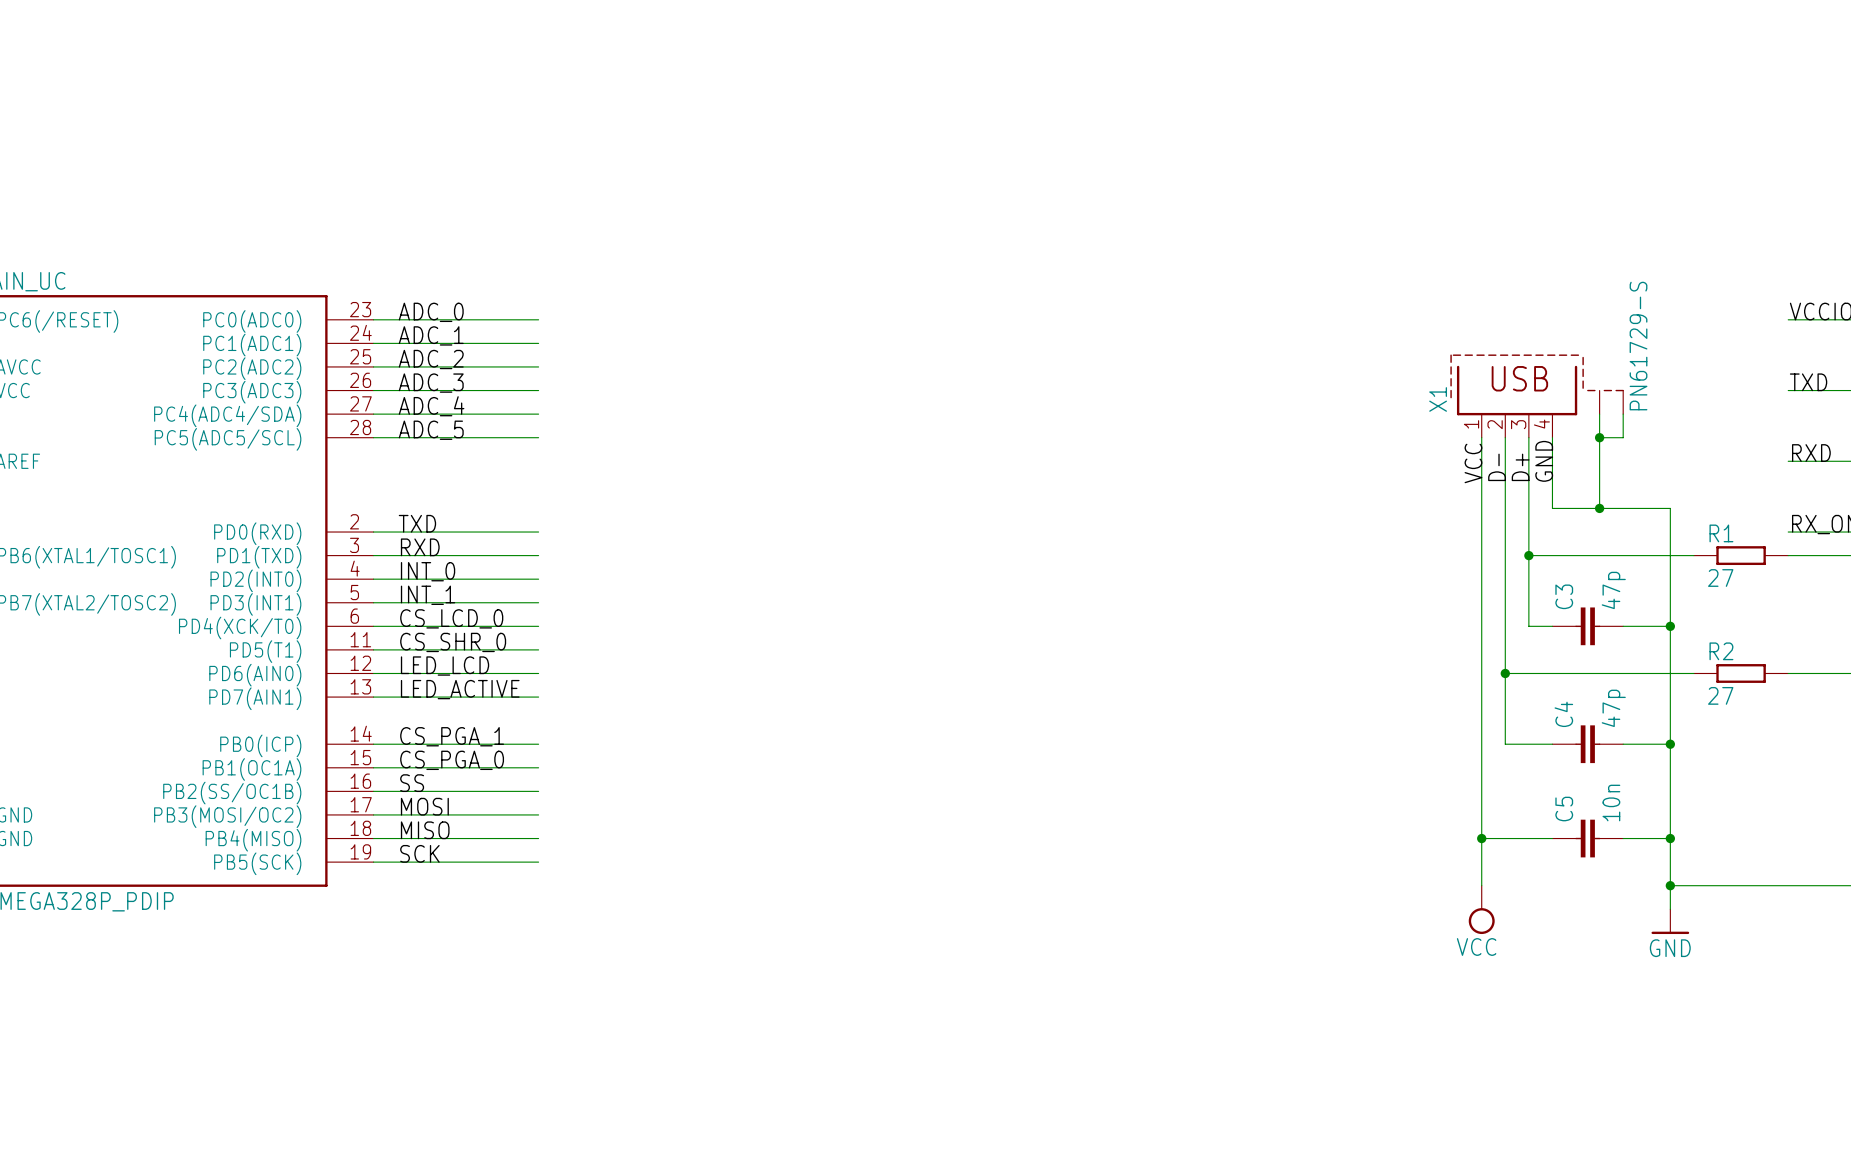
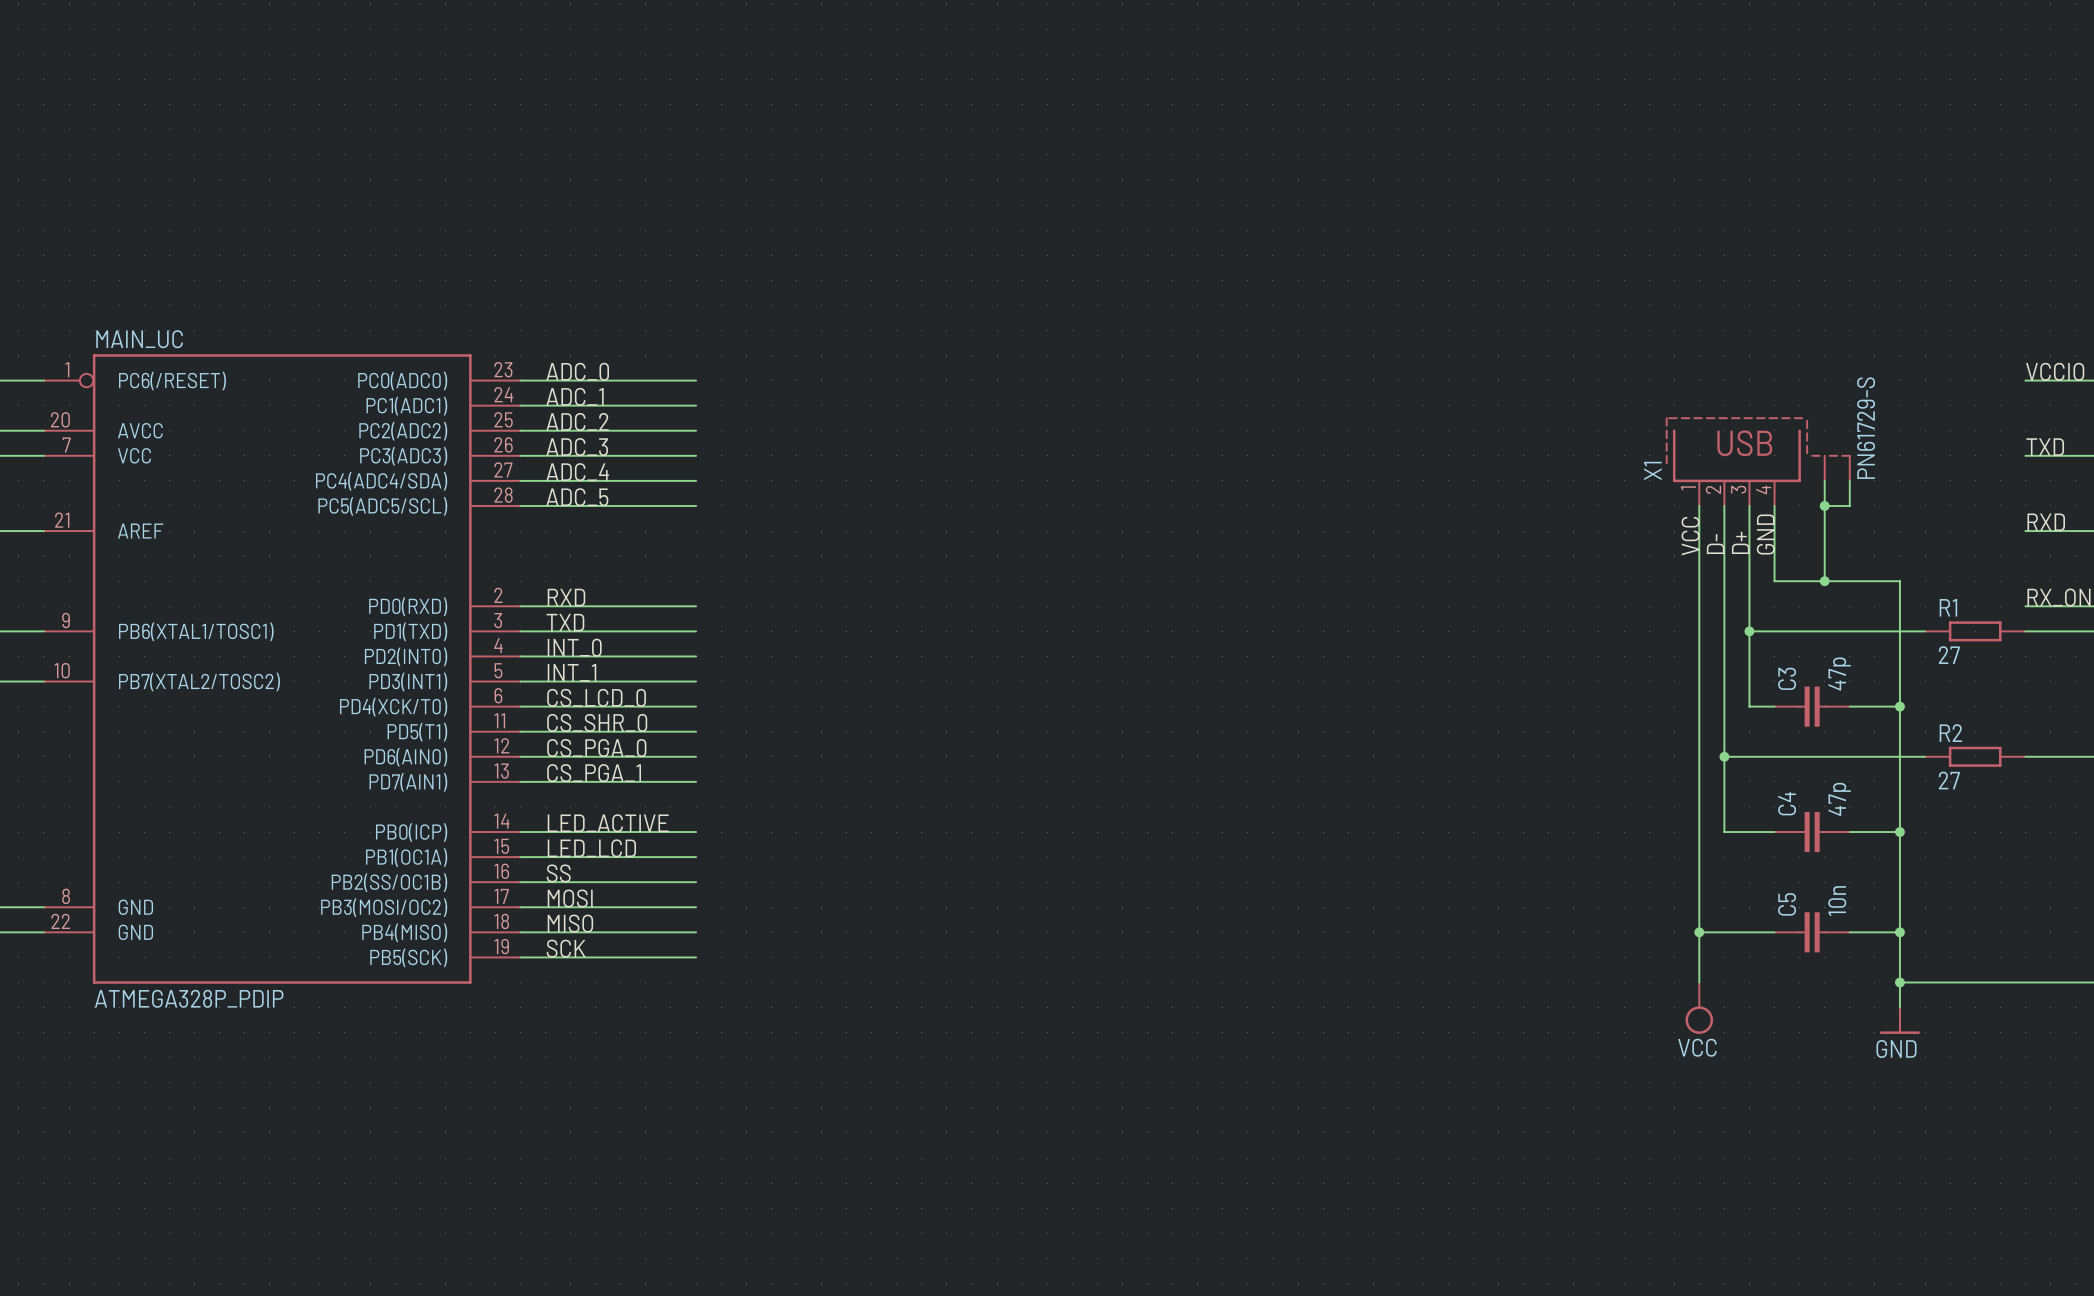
label: TXD (417, 523) -> RXD (566, 597)
label: RXD (420, 547) -> TXD (565, 622)
label: LED_LCD (445, 666) -> CS_PGA_0 (596, 748)
label: LED_ACTIVE (460, 689) -> CS_PGA_1 (594, 773)
label: CS_PGA_1 (452, 736) -> LED_ACTIVE (608, 823)
label: CS_PGA_0 (452, 760) -> LED_LCD (591, 848)

